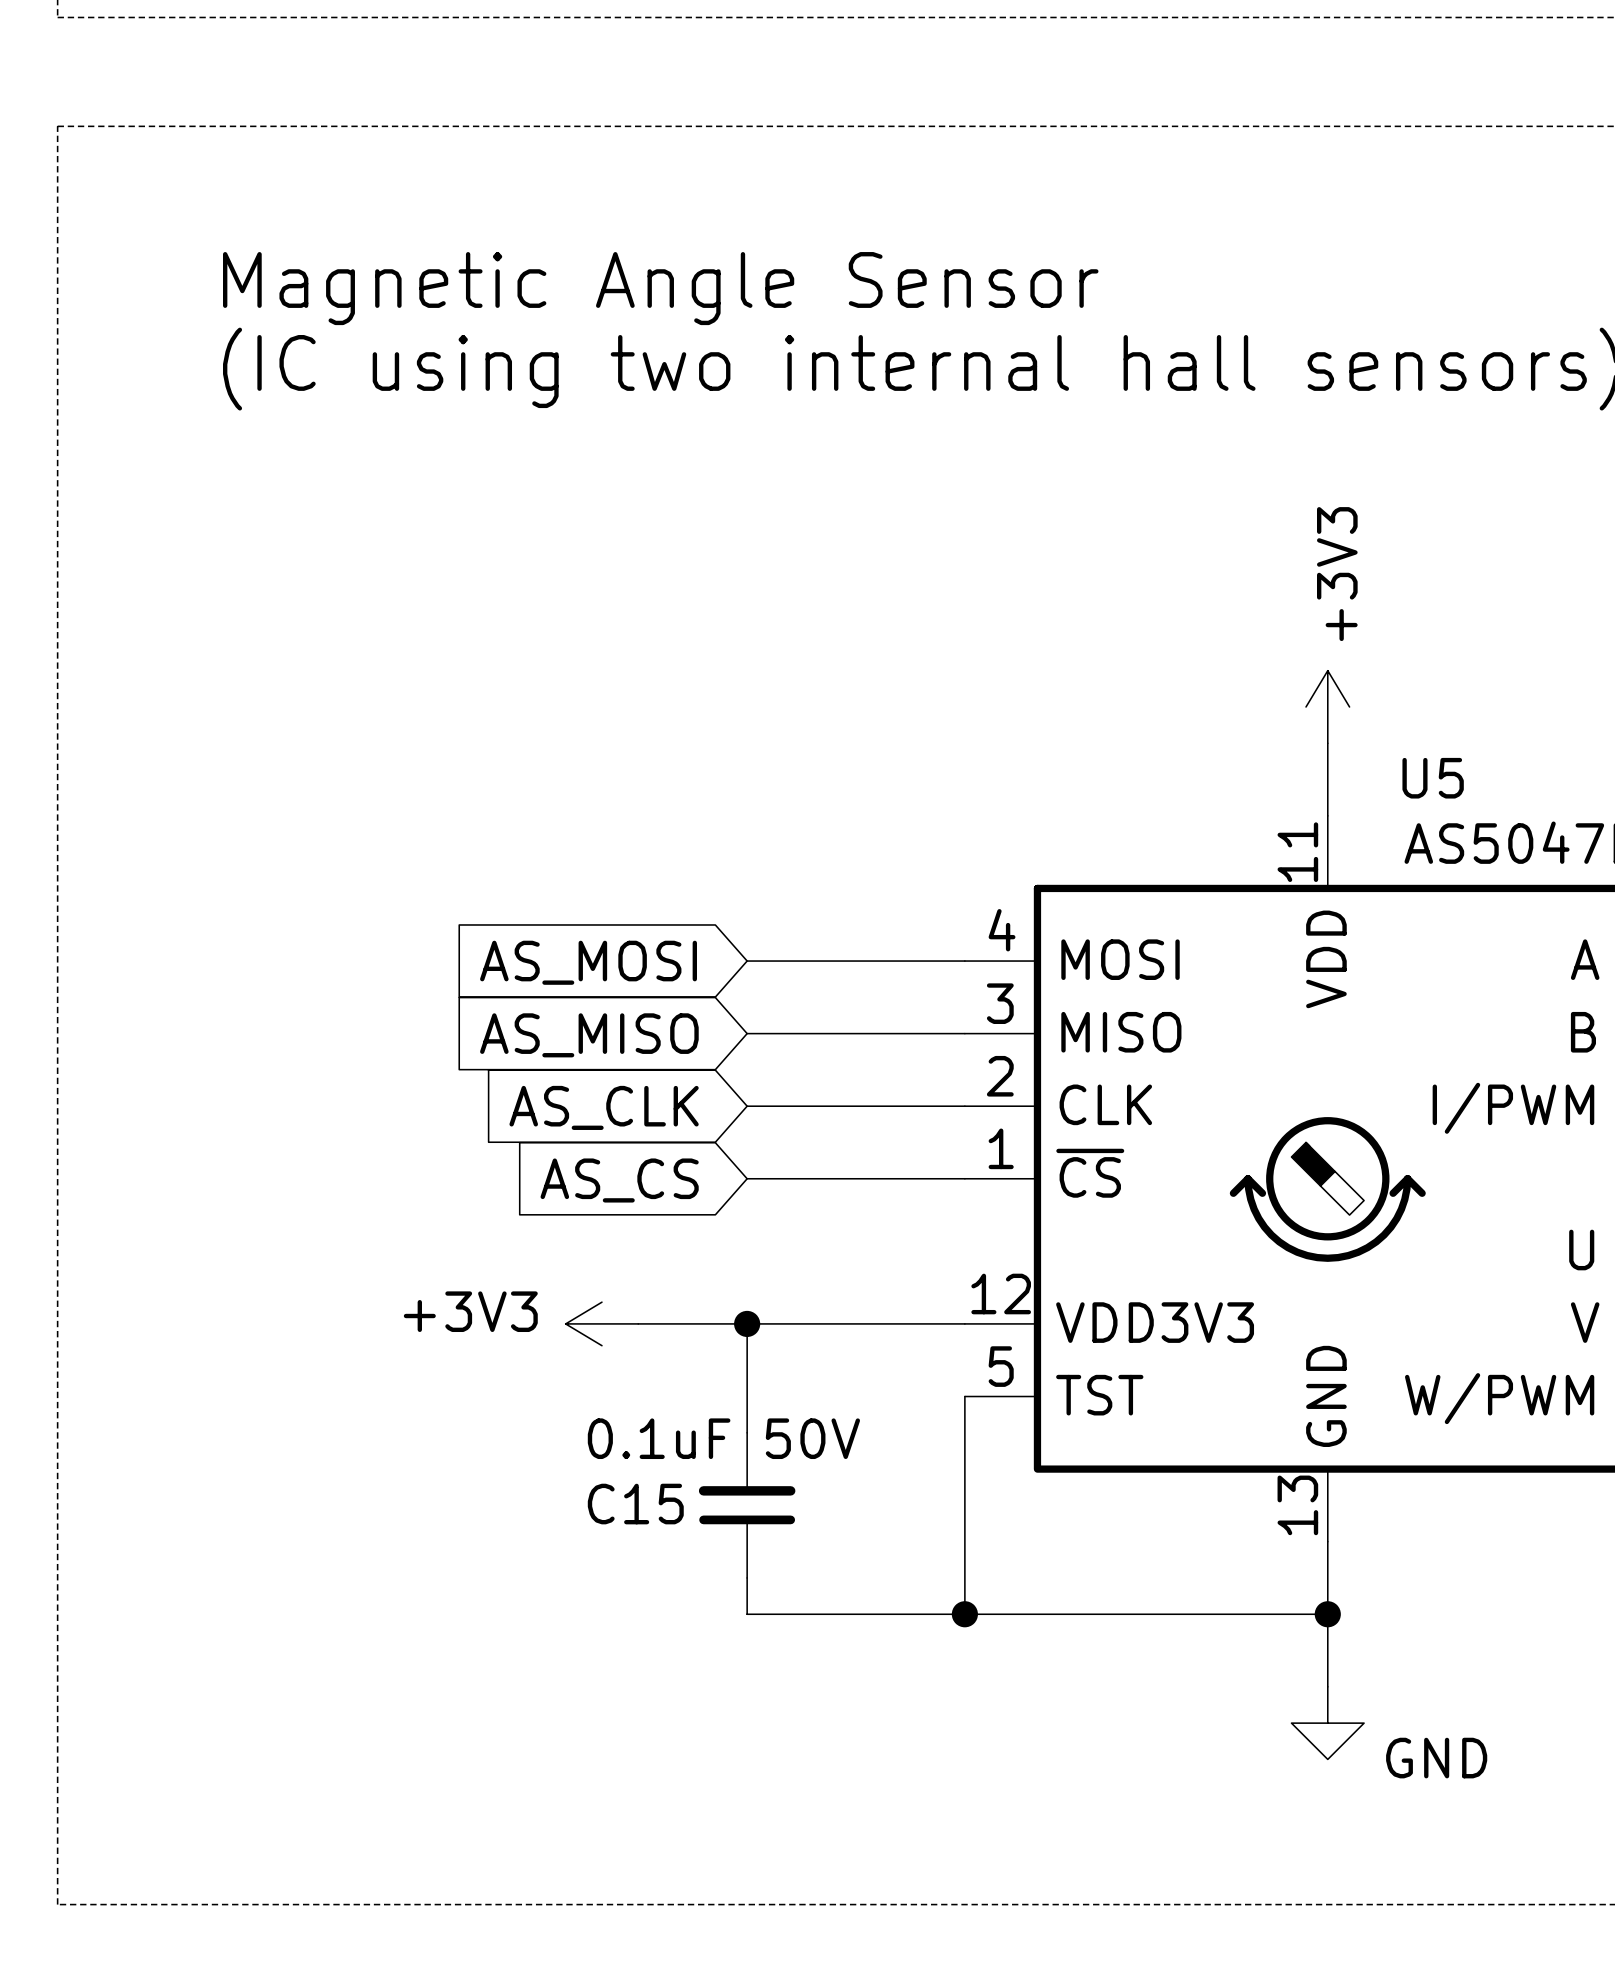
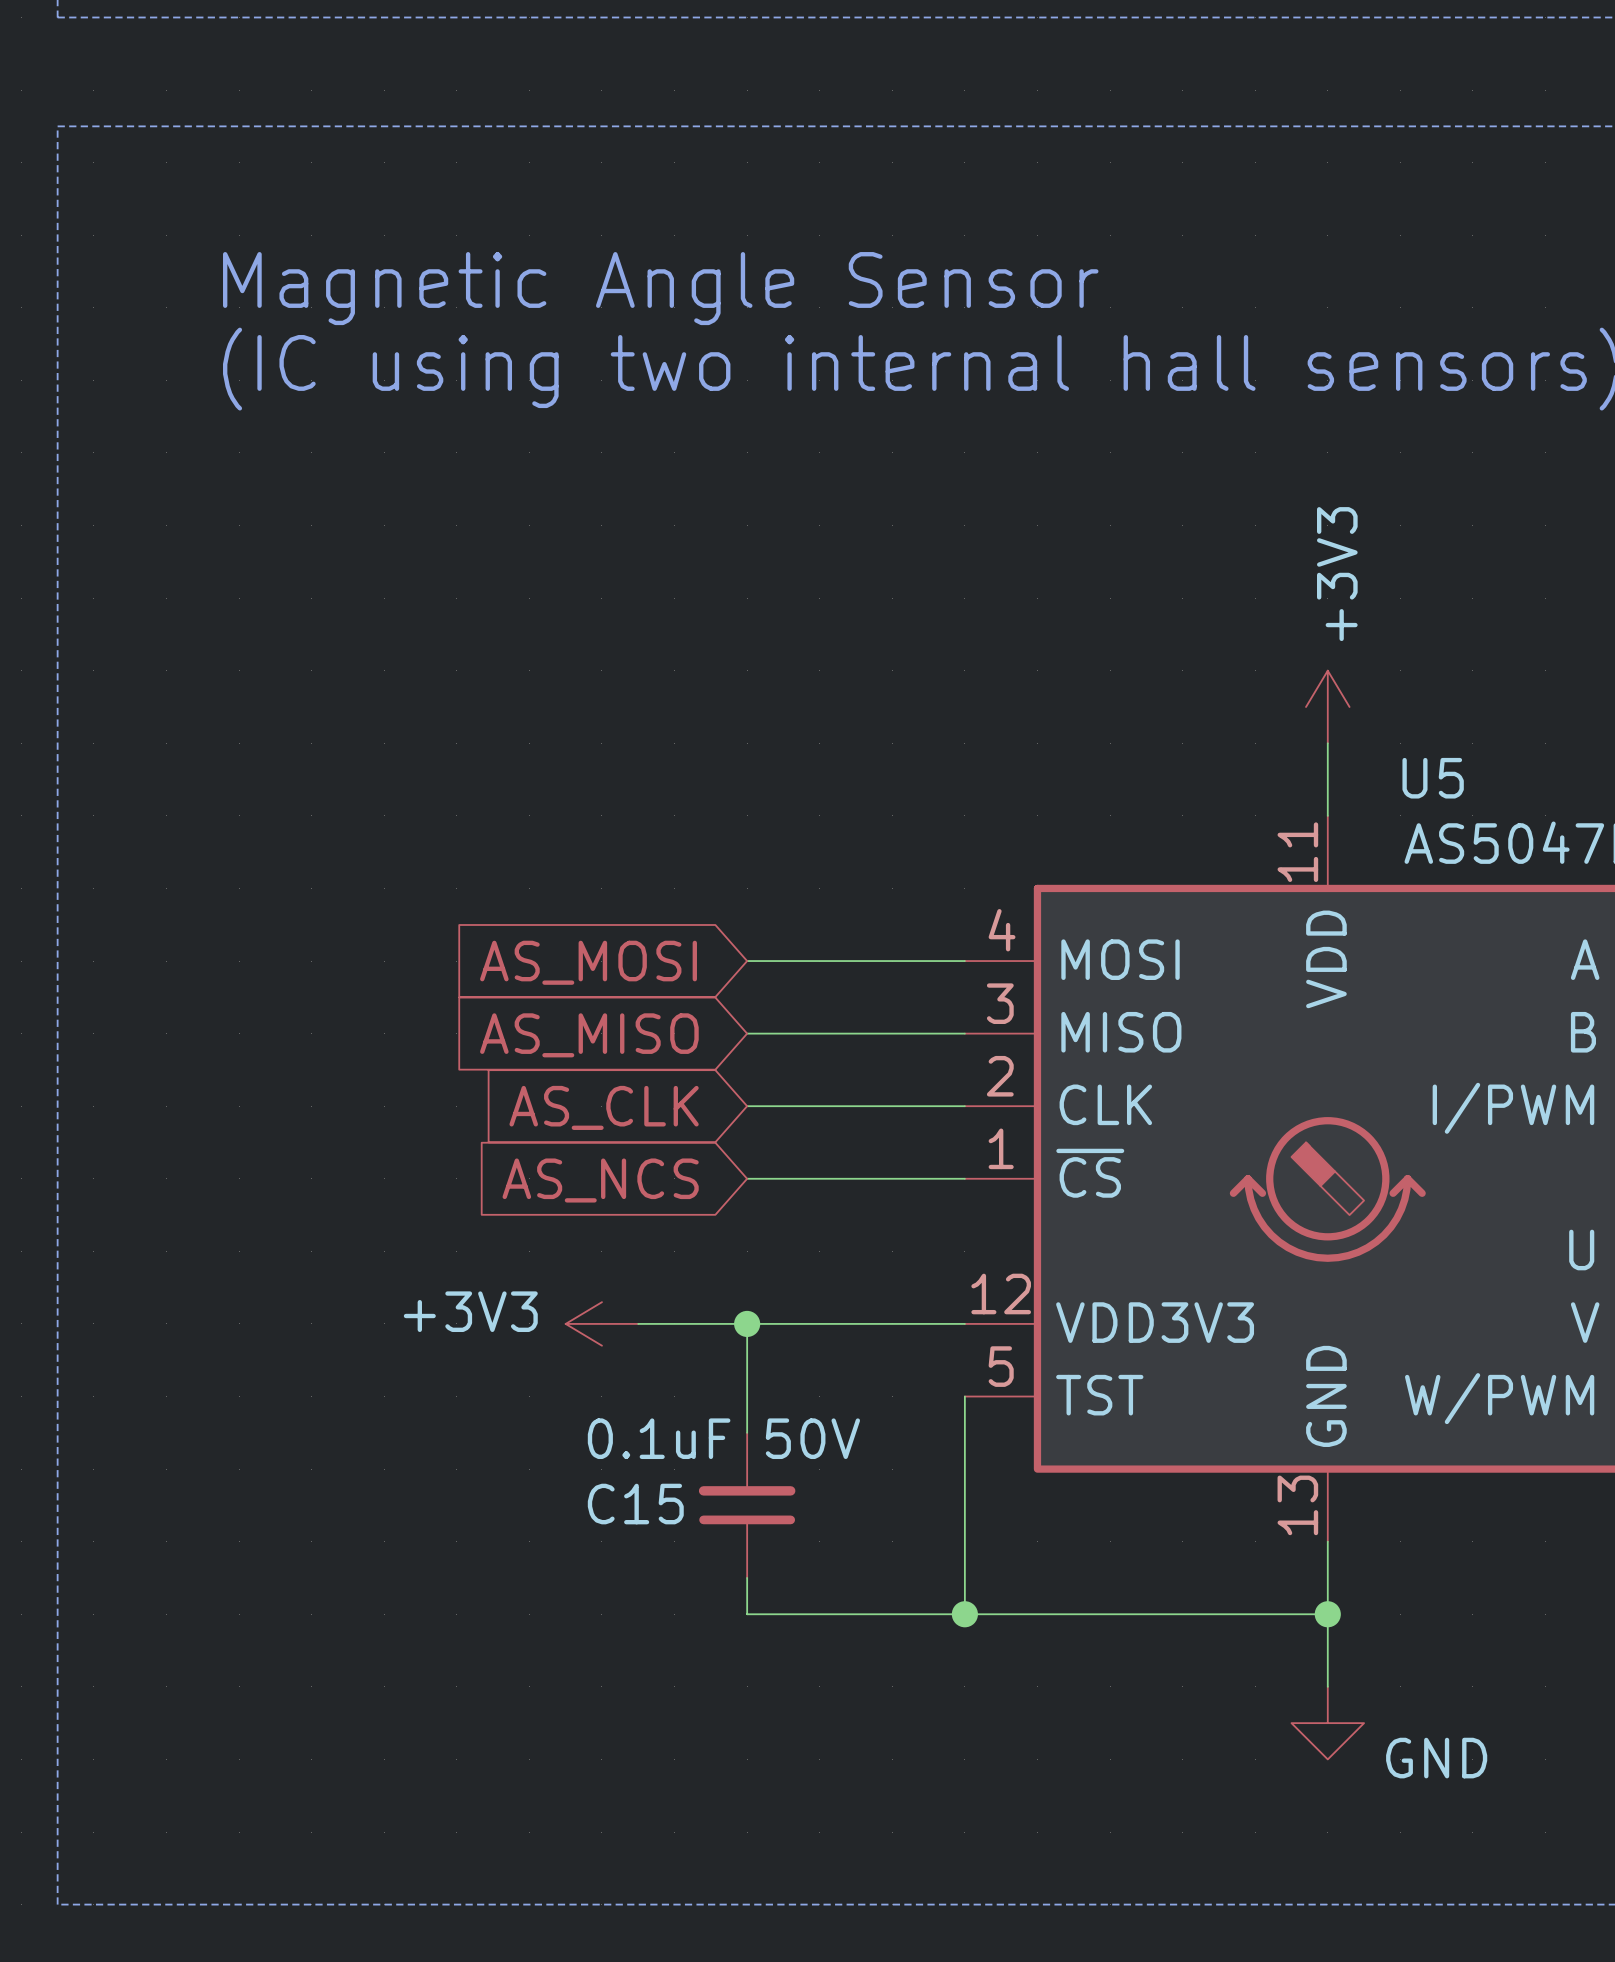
global label: AS_CS (619, 1180) -> AS_NCS (600, 1180)

